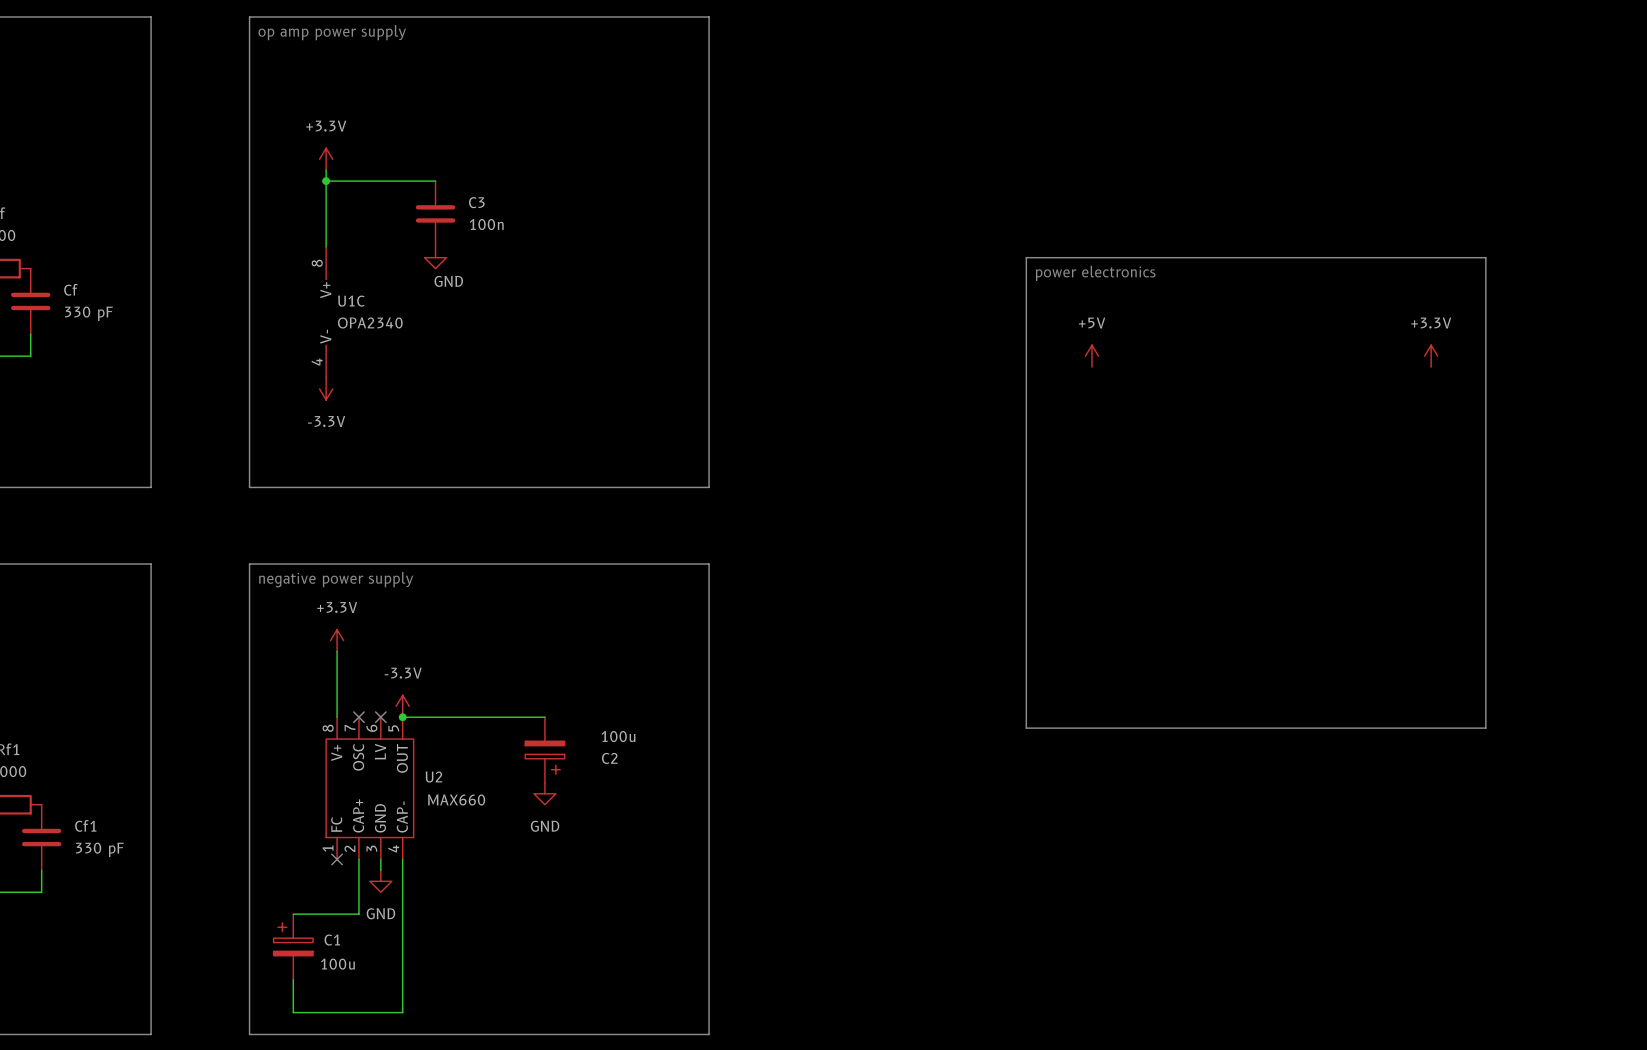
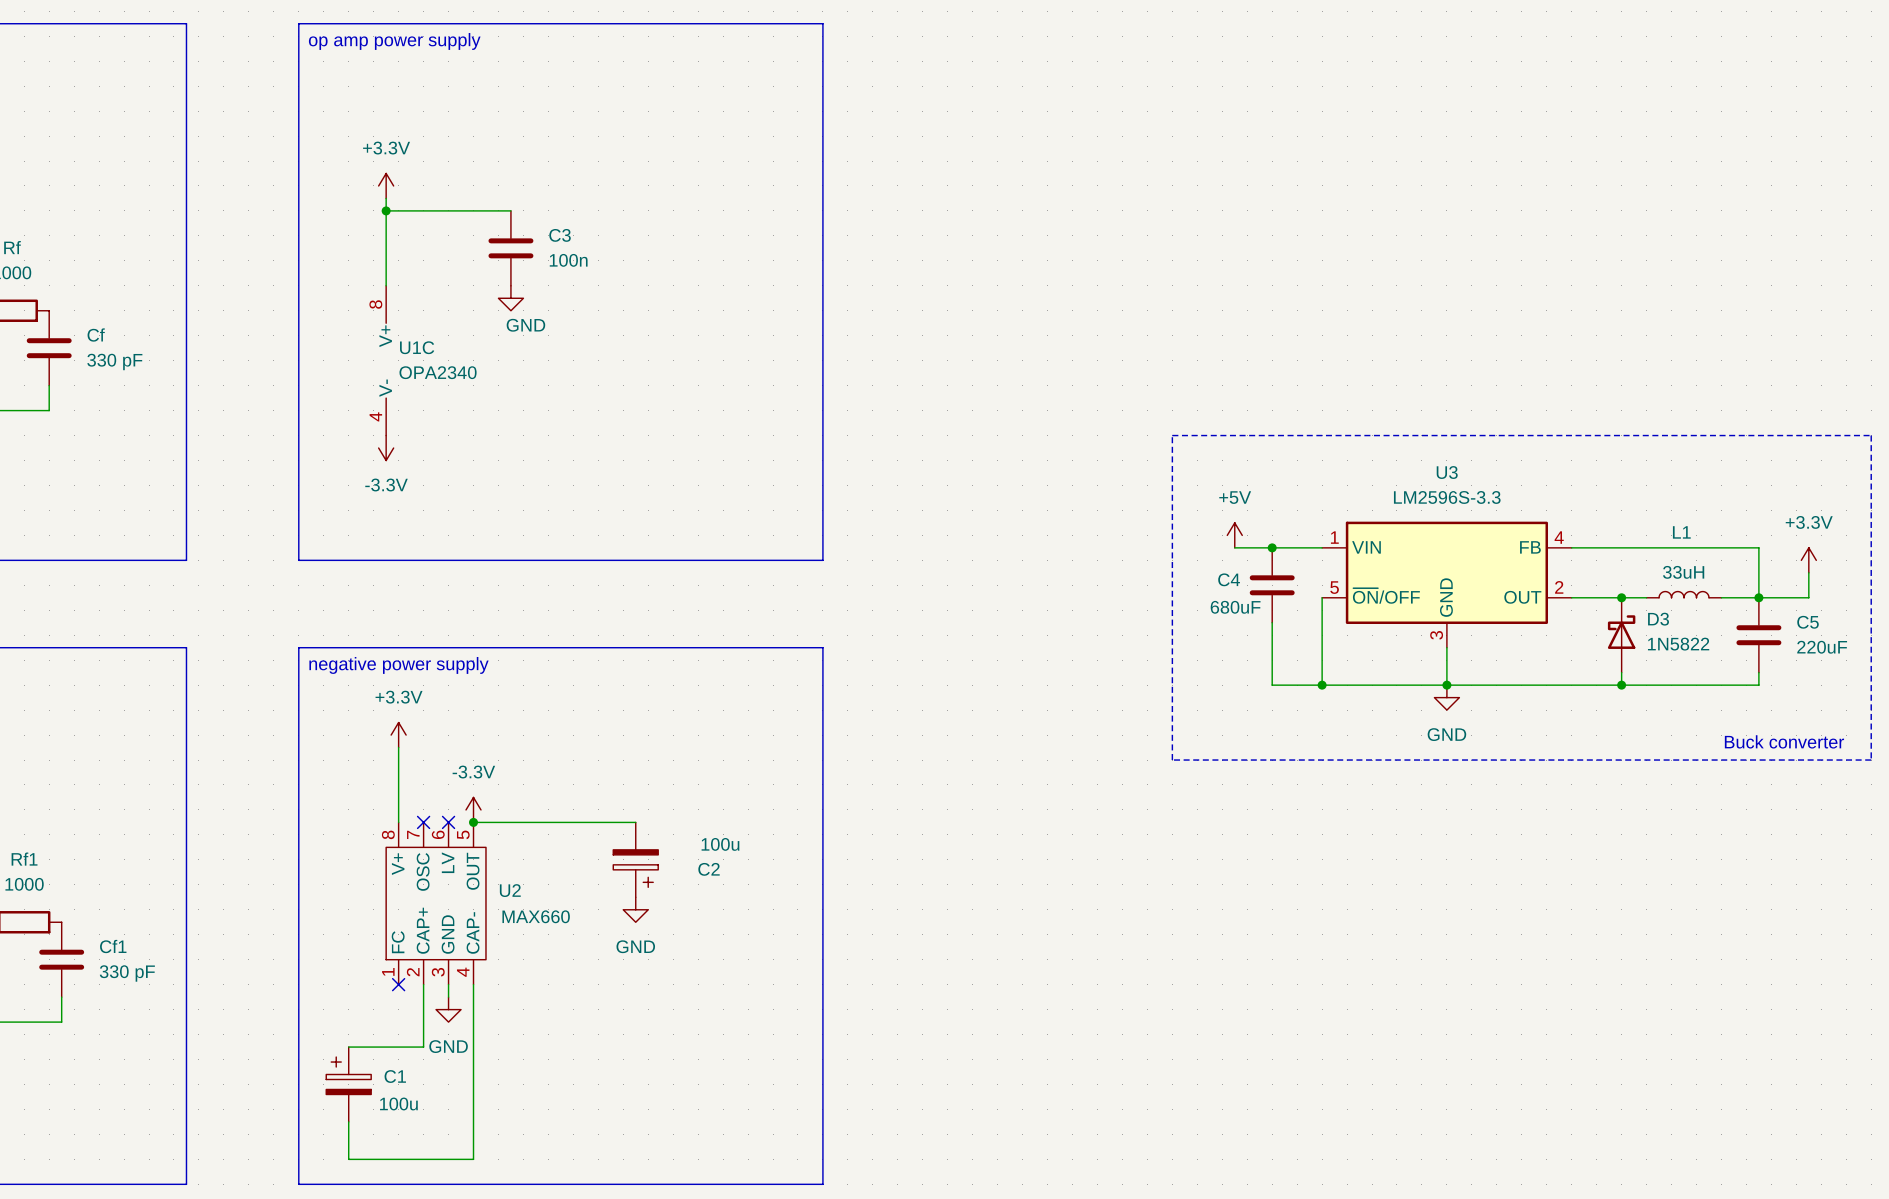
line: (1026, 257) (1485, 257) (1485, 728) (1026, 728) (1026, 257) -> (1172, 435) (1172, 760) (1871, 760) (1871, 435) (1172, 435)
text: power electronics (1095, 273) -> none
power symbol position: +5V (1091, 356) -> +5V (1234, 535)
power symbol position: +3.3V (1431, 356) -> +3.3V (1808, 560)
wire: none -> (1234, 547) (1322, 547)
junction: none -> (1272, 547)
wire: none -> (1571, 547) (1758, 547) (1758, 597)
wire: none -> (1808, 572) (1808, 597) (1721, 597)
U3: none -> LM2596S-3.3 (1446, 584)
C4: none -> 680uF (1272, 585)
L1: none -> 33uH (1684, 594)
wire: none -> (1322, 597) (1322, 685)
wire: none -> (1571, 597) (1646, 597)
junction: none -> (1621, 597)
junction: none -> (1758, 597)
wire: none -> (1272, 622) (1272, 685) (1758, 685) (1758, 672)
D3: none -> 1N5822 (1621, 635)
C5: none -> 220uF (1758, 635)
wire: none -> (1446, 647) (1446, 685)
wire: none -> (1621, 672) (1621, 685)
junction: none -> (1322, 685)
junction: none -> (1446, 685)
junction: none -> (1621, 685)
power symbol: none -> GND (1446, 697)
text: none -> Buck converter (1784, 741)

